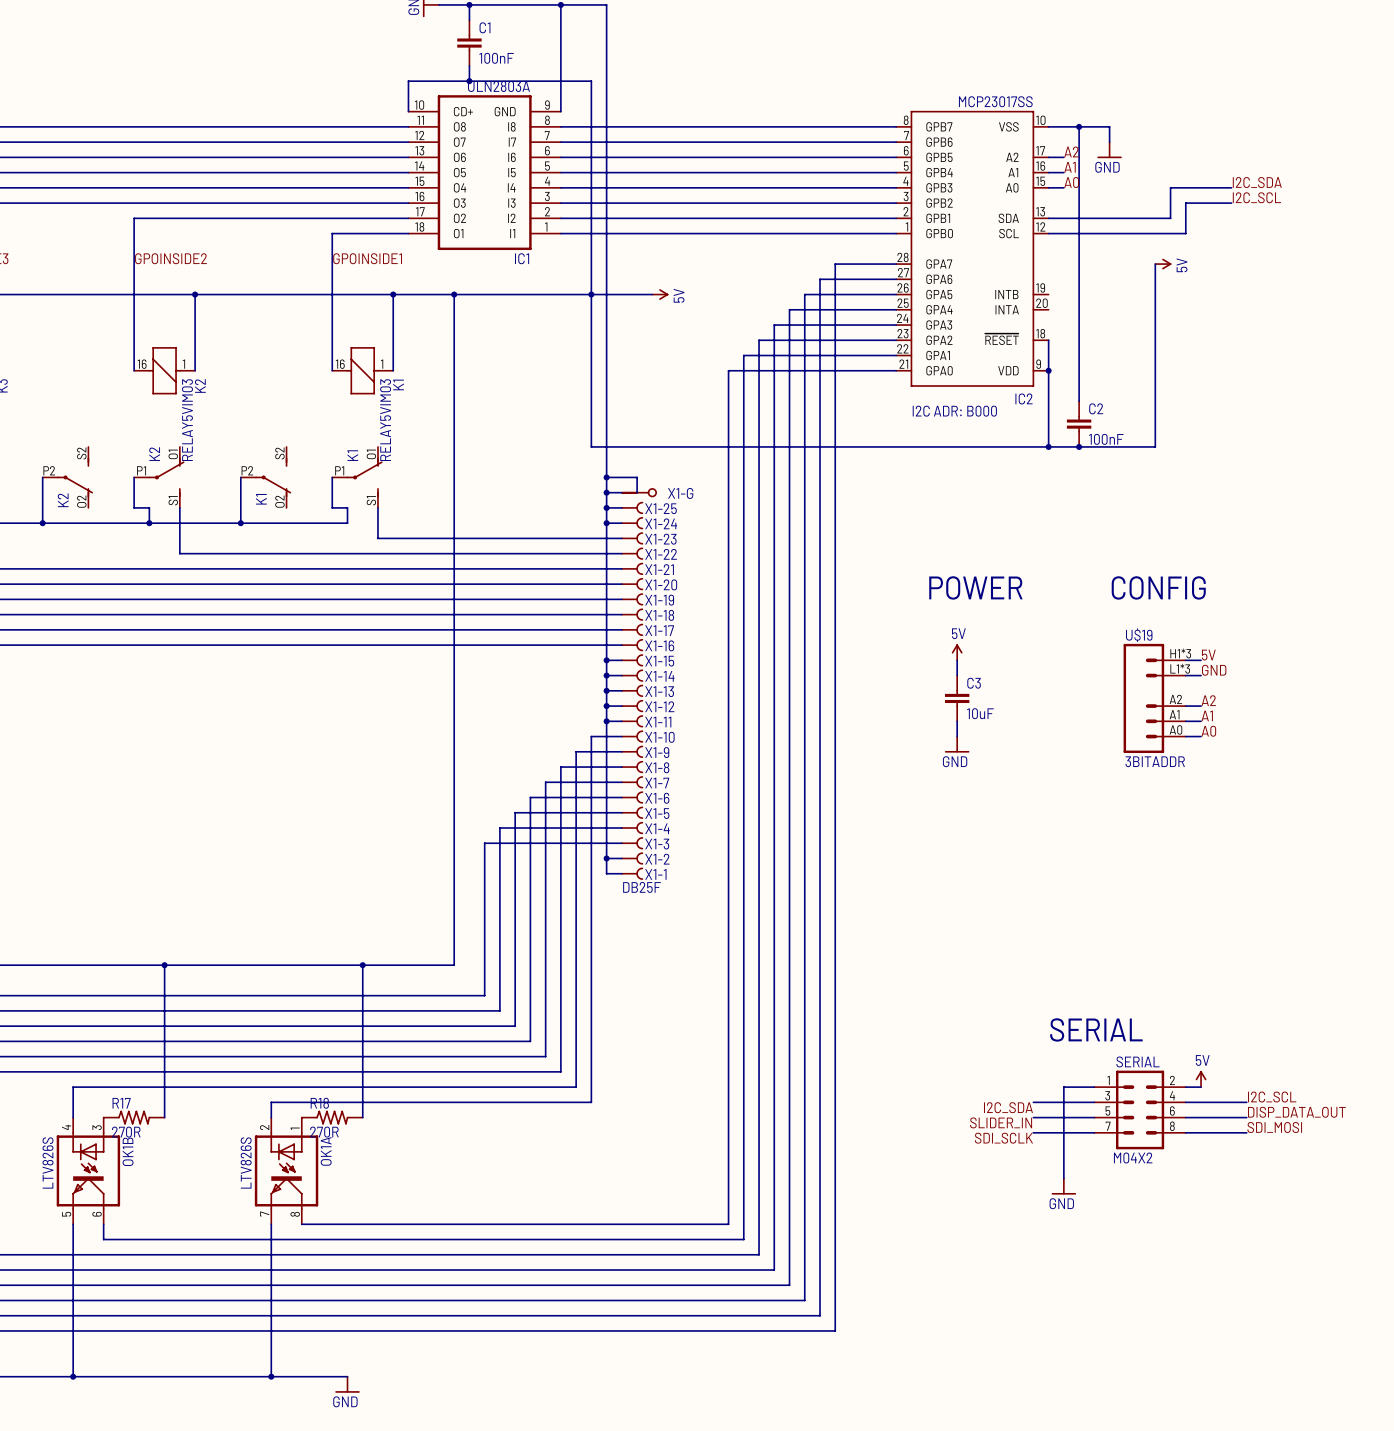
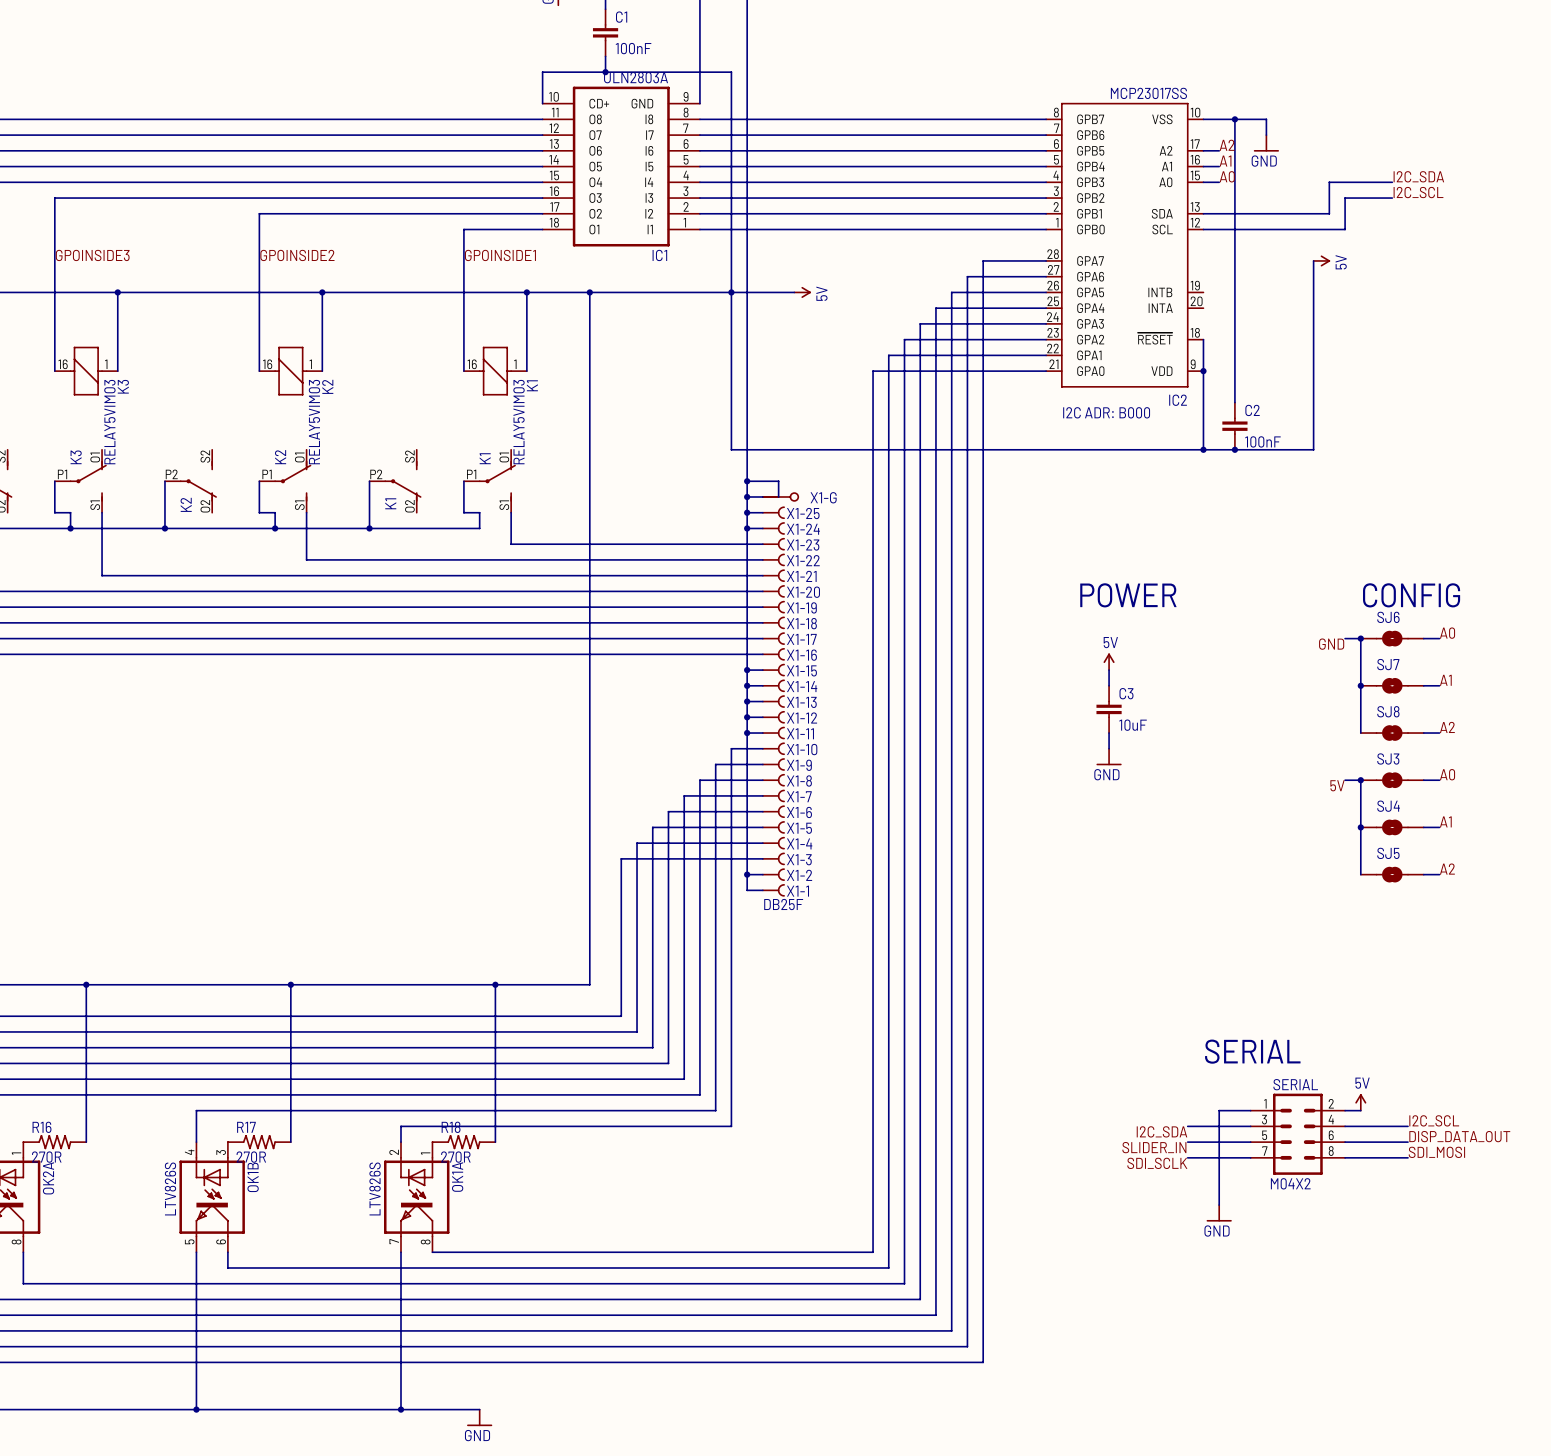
text position: CONFIG (1158, 587) -> CONFIG (1411, 595)
label: none -> A0 (1447, 633)
junction: none -> (1360, 638)
SJ6: none -> (1392, 638)
label position: 5V (1208, 655) -> 5V (1337, 785)
wire: (1185, 660) (1201, 660) -> (1423, 638) (1439, 638)
label position: GND (1214, 670) -> GND (1331, 644)
label: none -> A1 (1445, 680)
wire: (1185, 675) (1201, 675) -> (1423, 685) (1439, 685)
junction: none -> (1360, 685)
SJ7: none -> (1392, 685)
U$19: 3BITADDR (1154, 698) -> none
label position: A2 (1208, 700) -> A2 (1447, 727)
wire: (1185, 706) (1201, 706) -> (1423, 733) (1439, 733)
label: A1 (1207, 715) -> none
wire: (1185, 721) (1201, 721) -> (1345, 638) (1360, 638) (1360, 733)
SJ8: none -> (1392, 733)
label: A0 (1208, 731) -> none
wire: (1185, 736) (1201, 736) -> (1423, 780) (1439, 780)
label: none -> A0 (1447, 774)
wire: none -> (1345, 780) (1360, 780) (1360, 874)
junction: none -> (1360, 780)
SJ3: none -> (1392, 780)
label: none -> A1 (1445, 821)
junction: none -> (1360, 827)
SJ4: none -> (1392, 827)
wire: none -> (1423, 827) (1439, 827)
label: none -> A2 (1447, 869)
SJ5: none -> (1392, 874)
wire: none -> (1423, 874) (1439, 874)

